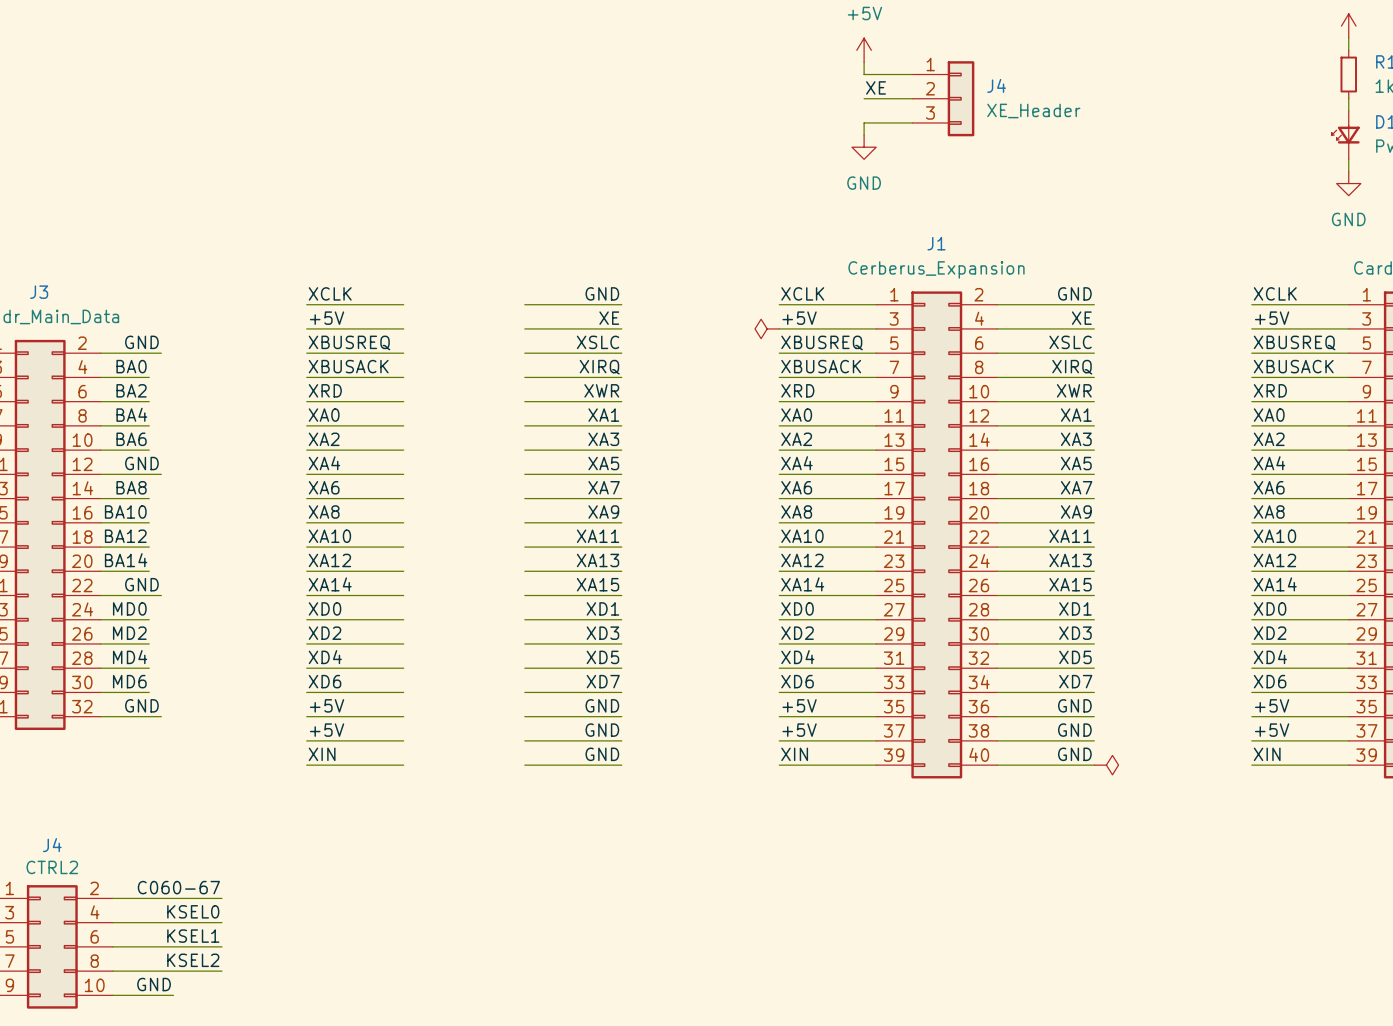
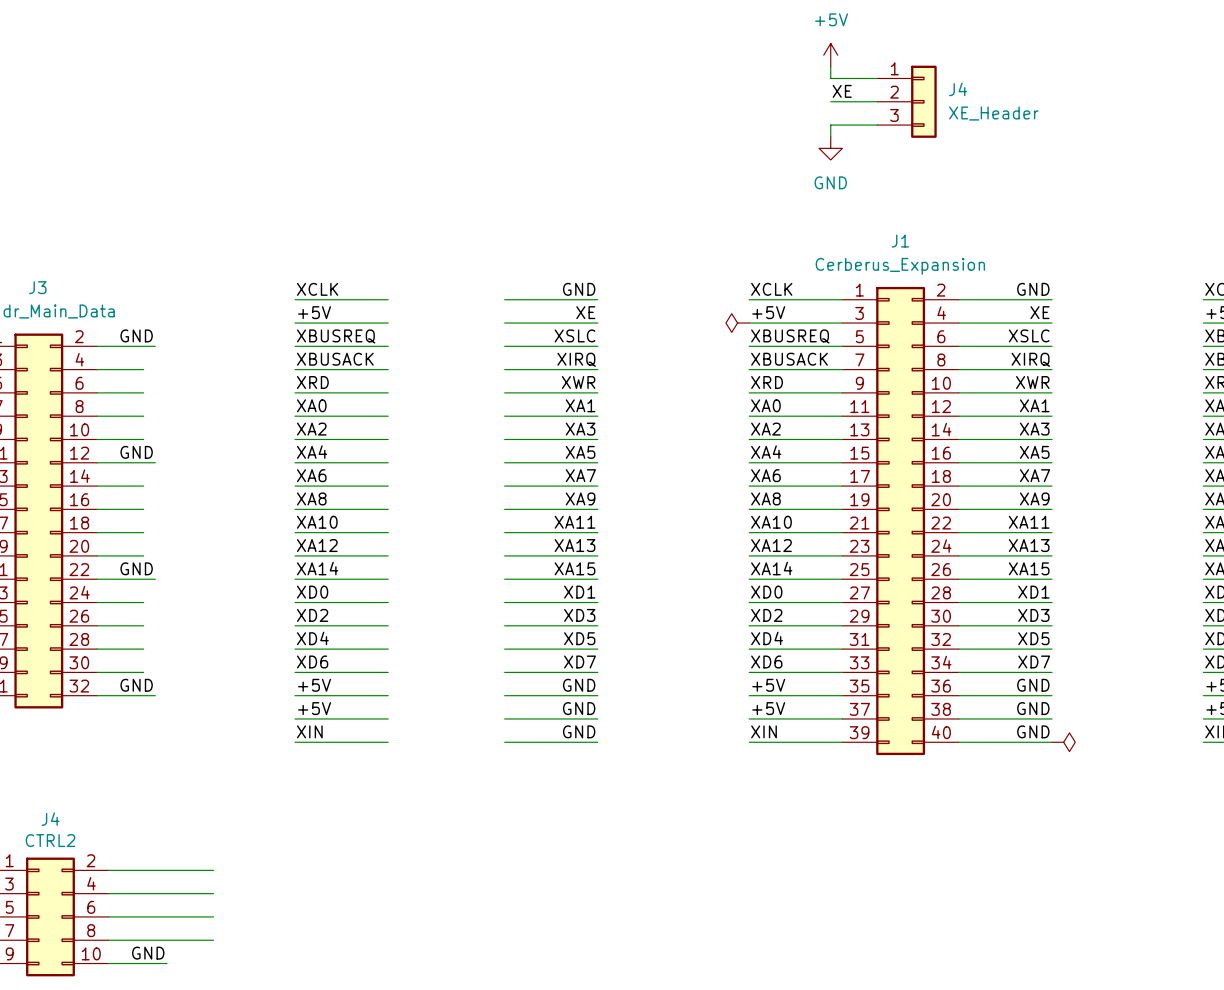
label: BA0 (131, 366) -> none
label: BA2 (131, 390) -> none
label: BA4 (131, 414) -> none
label: BA6 (131, 439) -> none
label: BA8 (131, 487) -> none
label: BA10 (125, 512) -> none
label: BA12 (125, 536) -> none
label: BA14 (126, 560) -> none
label: MD0 (129, 608) -> none
label: MD2 (129, 633) -> none
label: MD4 (130, 657) -> none
label: MD6 (129, 681) -> none
label: C060-67 (178, 887) -> none
label: KSEL0 (193, 911) -> none
label: KSEL1 (193, 936) -> none
label: KSEL2 (193, 960) -> none

